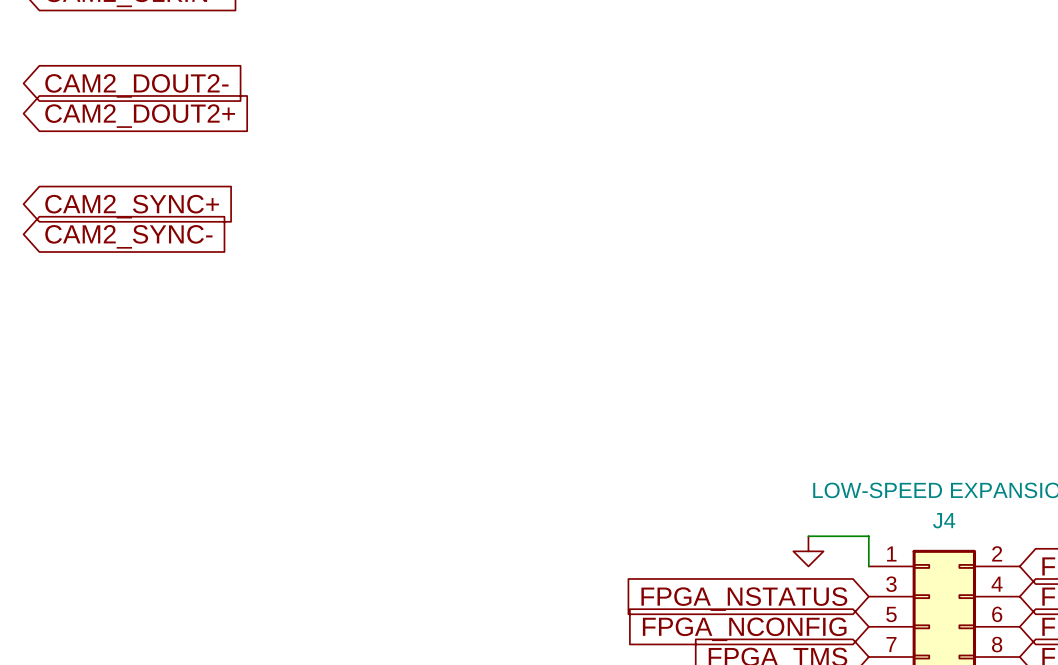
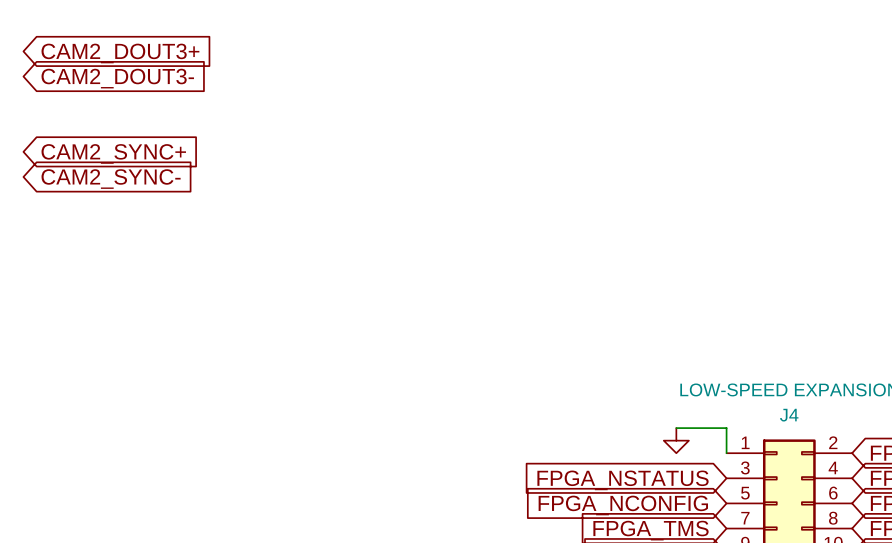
global label: CAM2_DOUT2- (136, 85) -> CAM2_DOUT3+ (120, 53)
global label: CAM2_DOUT2+ (140, 116) -> CAM2_DOUT3- (117, 78)

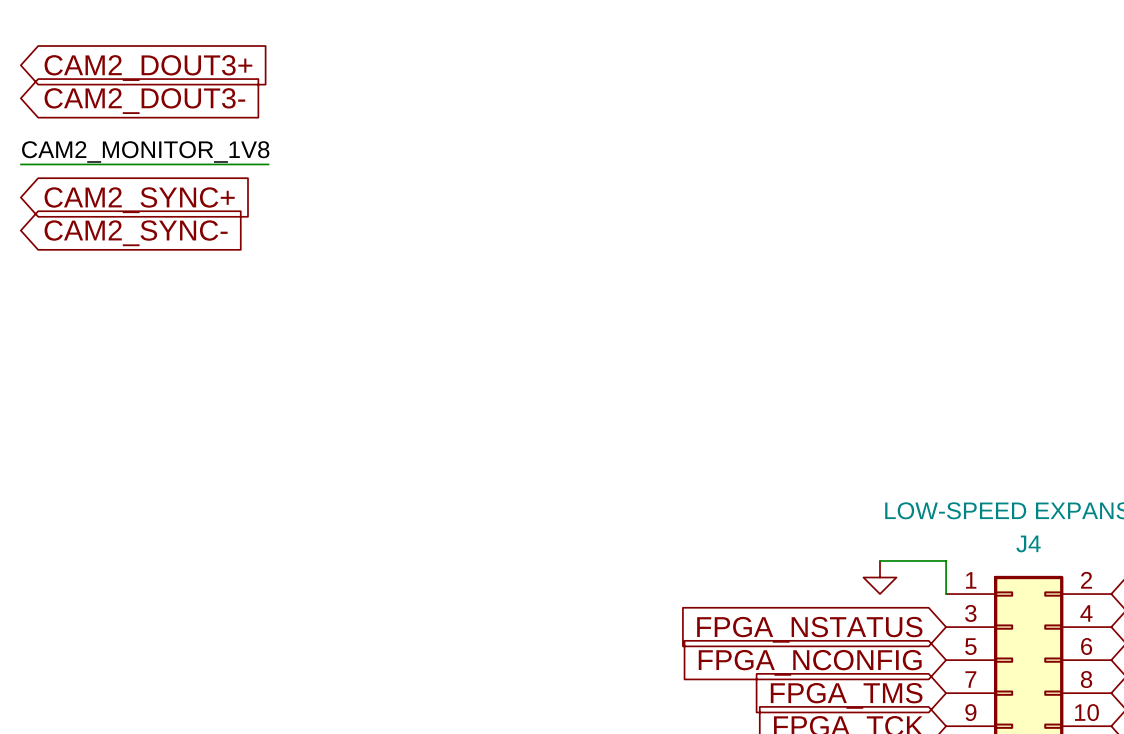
label: none -> CAM2_MONITOR_1V8 (145, 151)
wire: none -> (20, 164) (268, 164)

